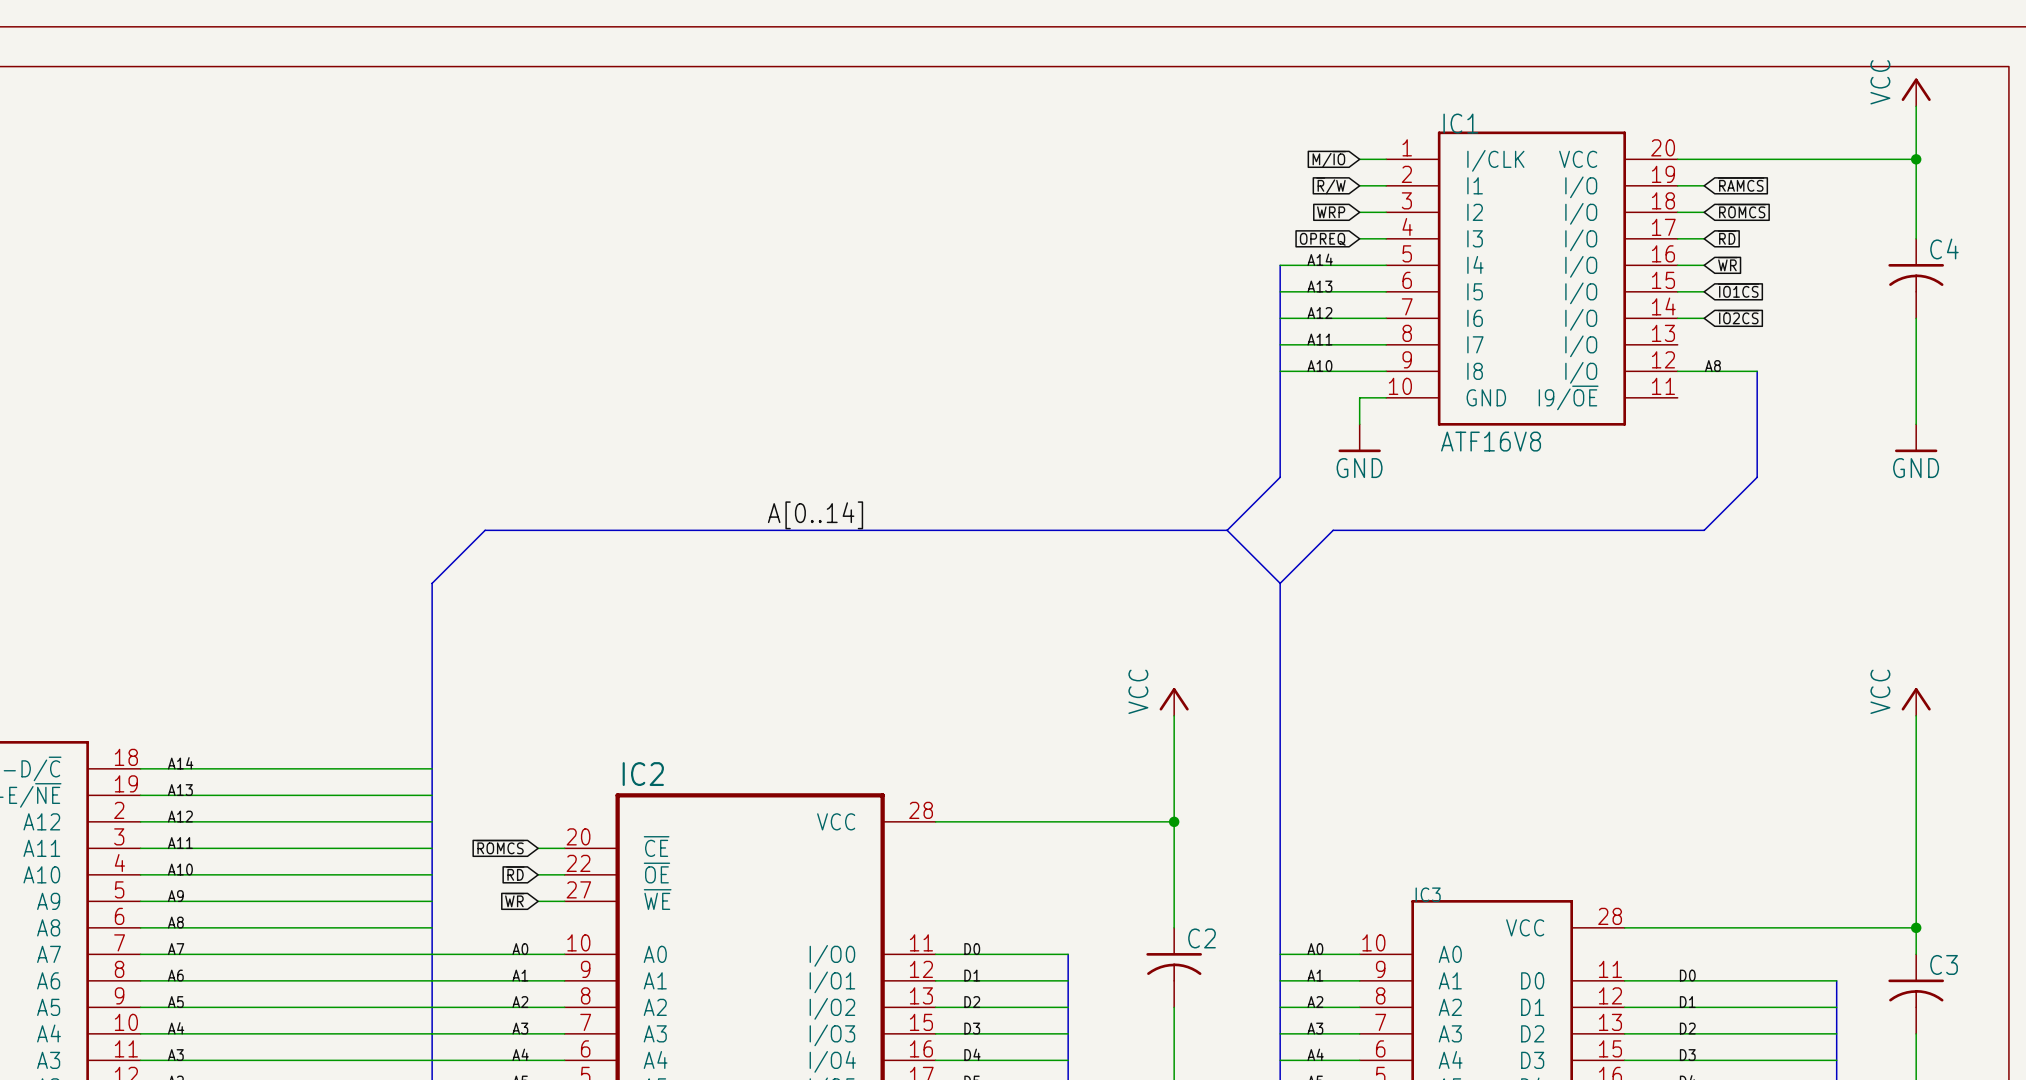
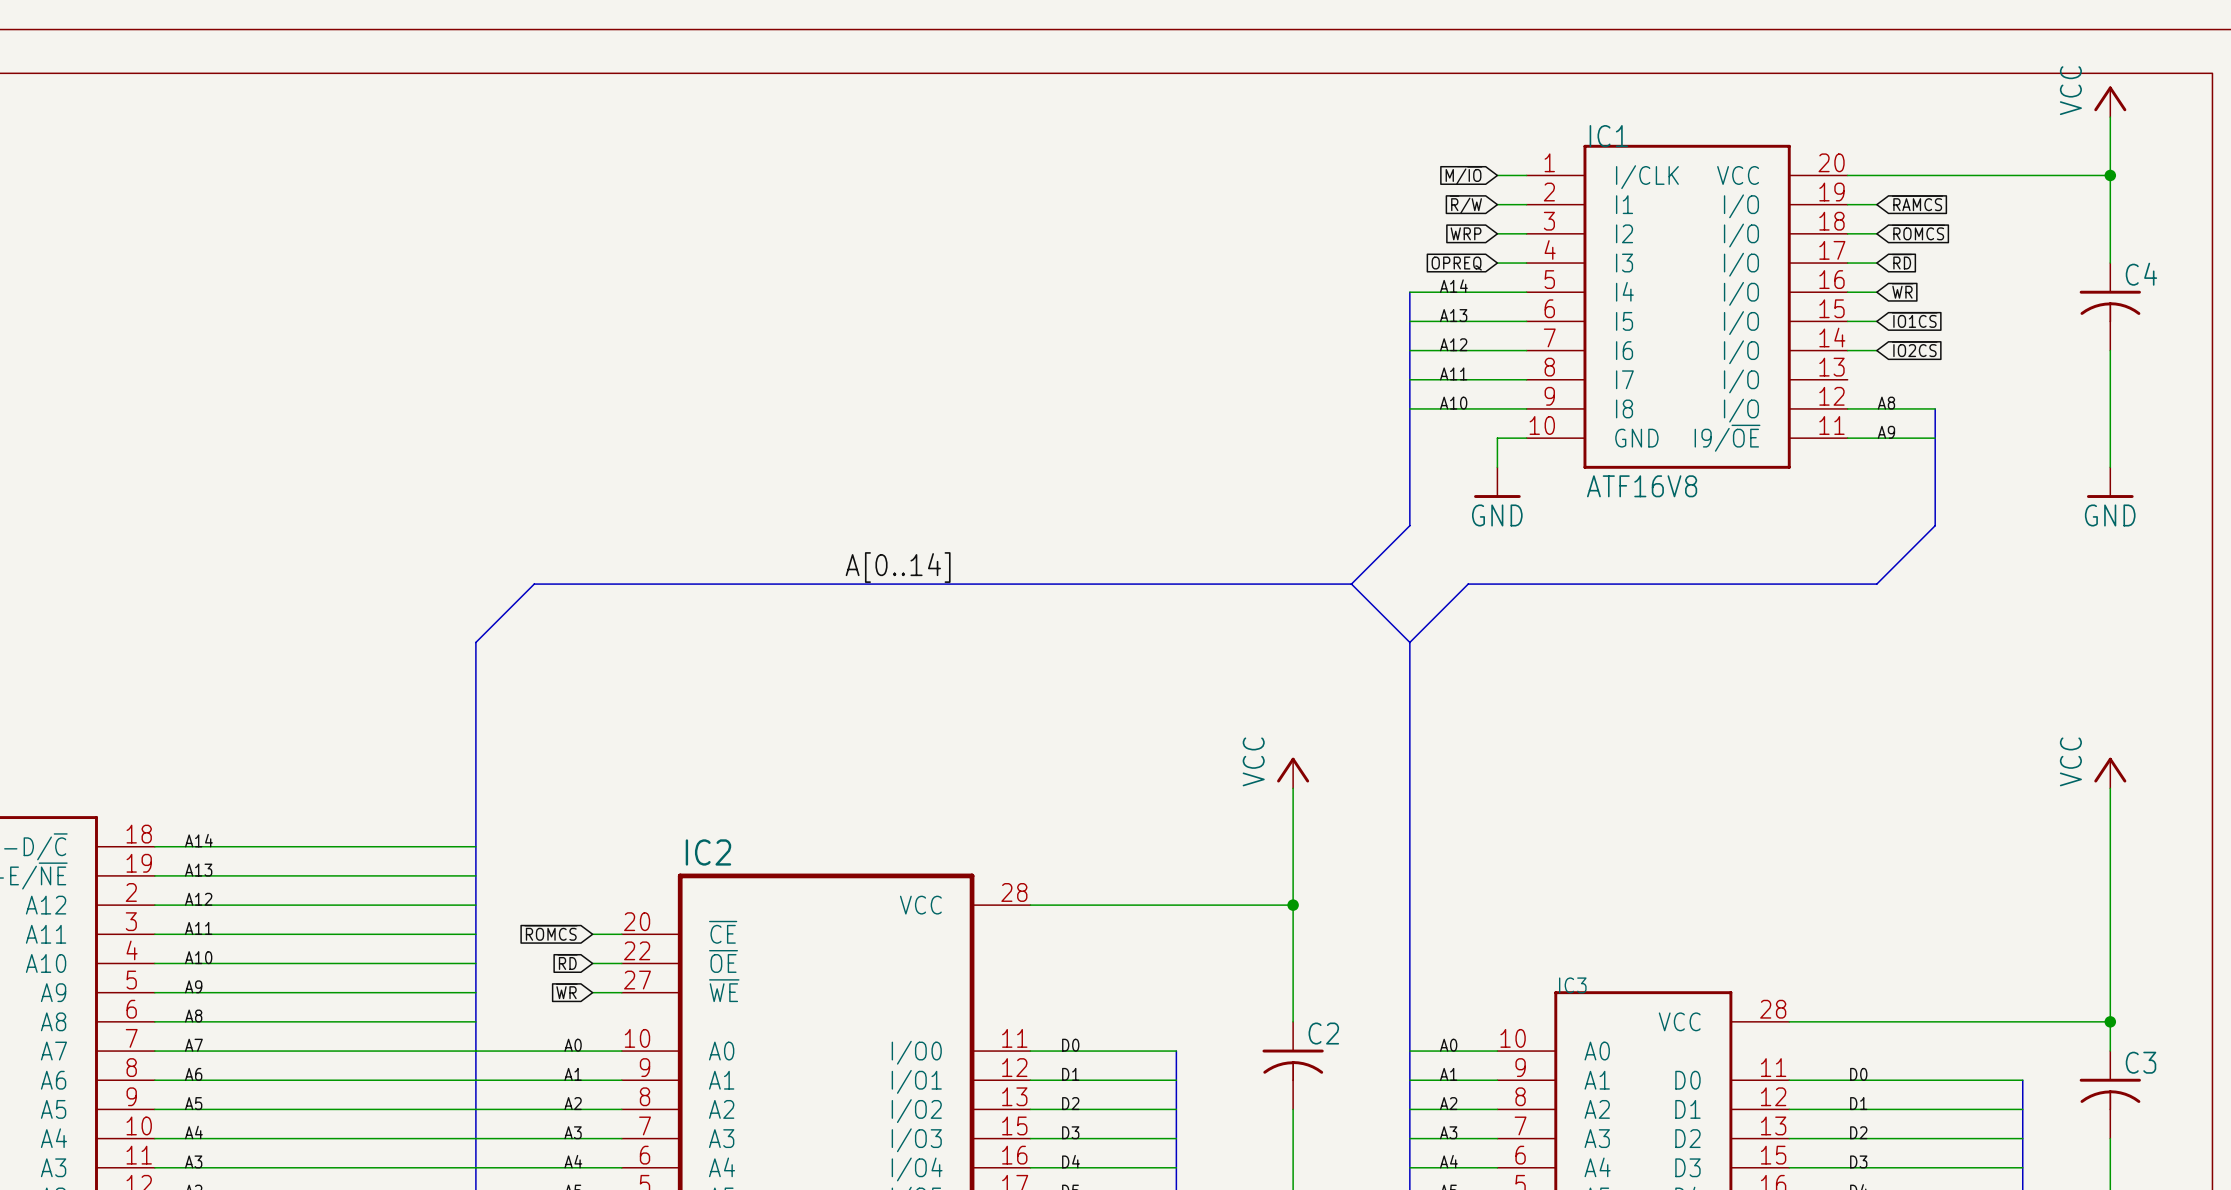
label: none -> A9 (1886, 432)
wire: none -> (1847, 438) (1935, 438)

